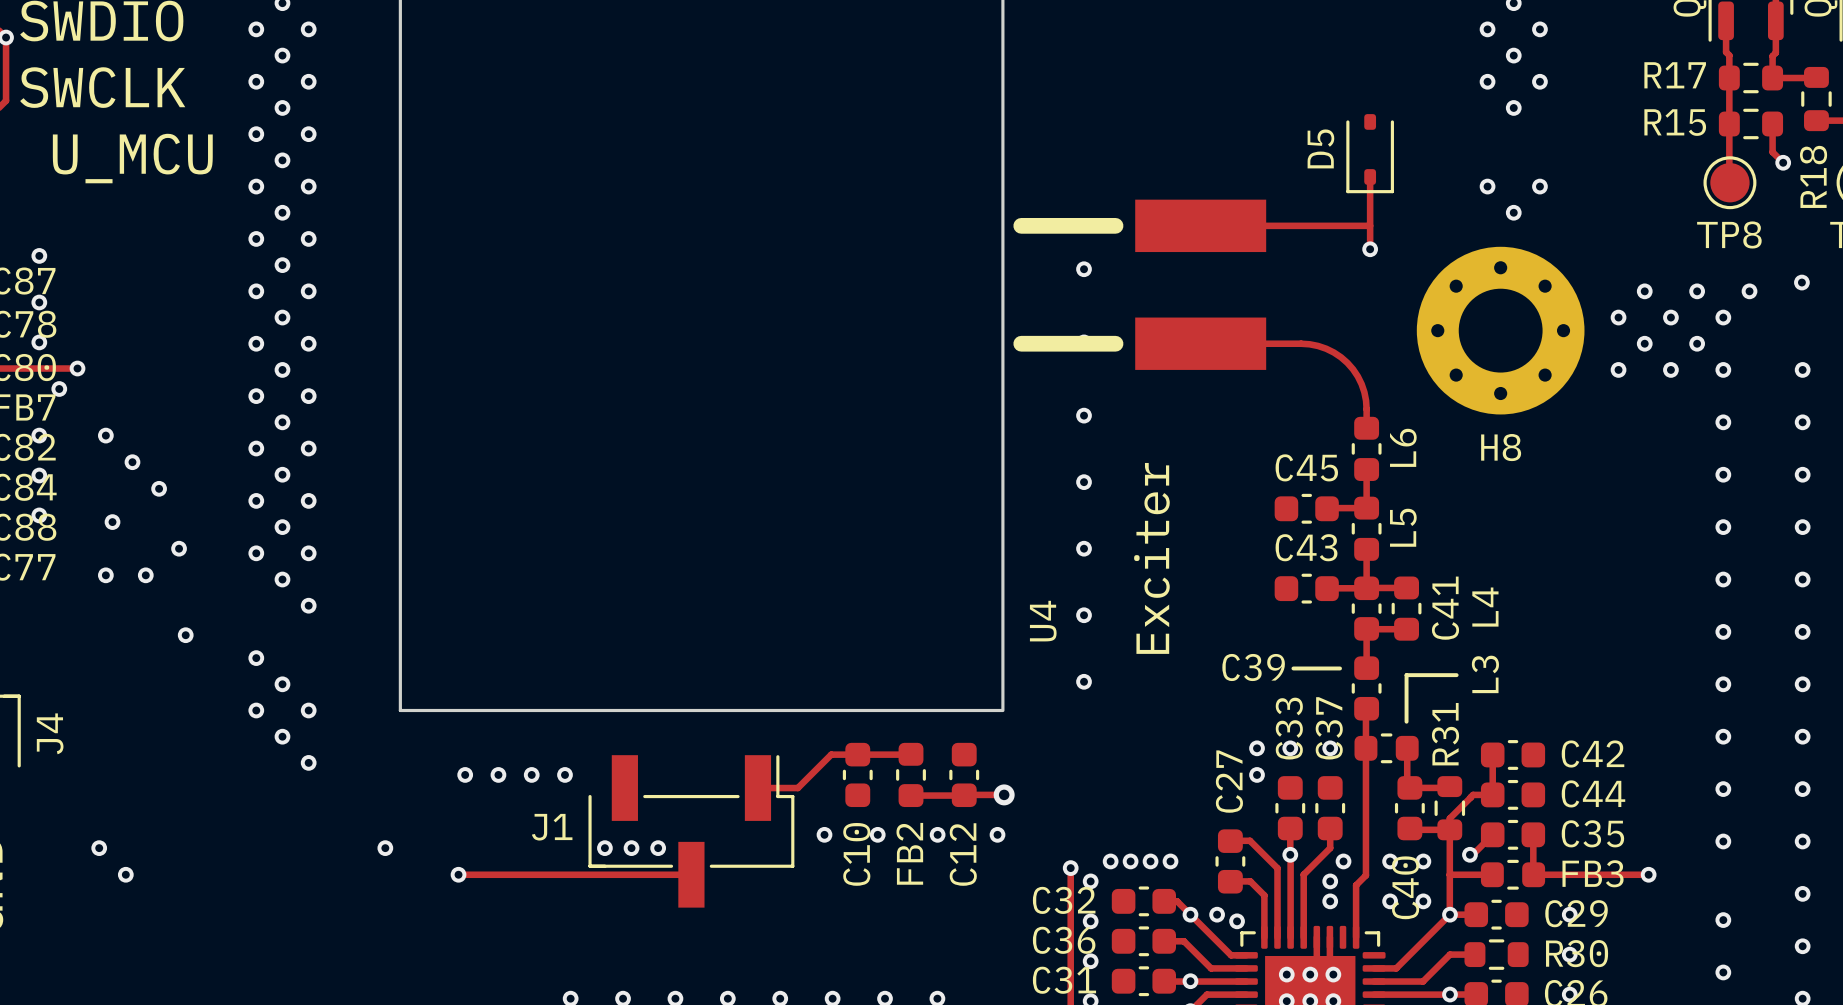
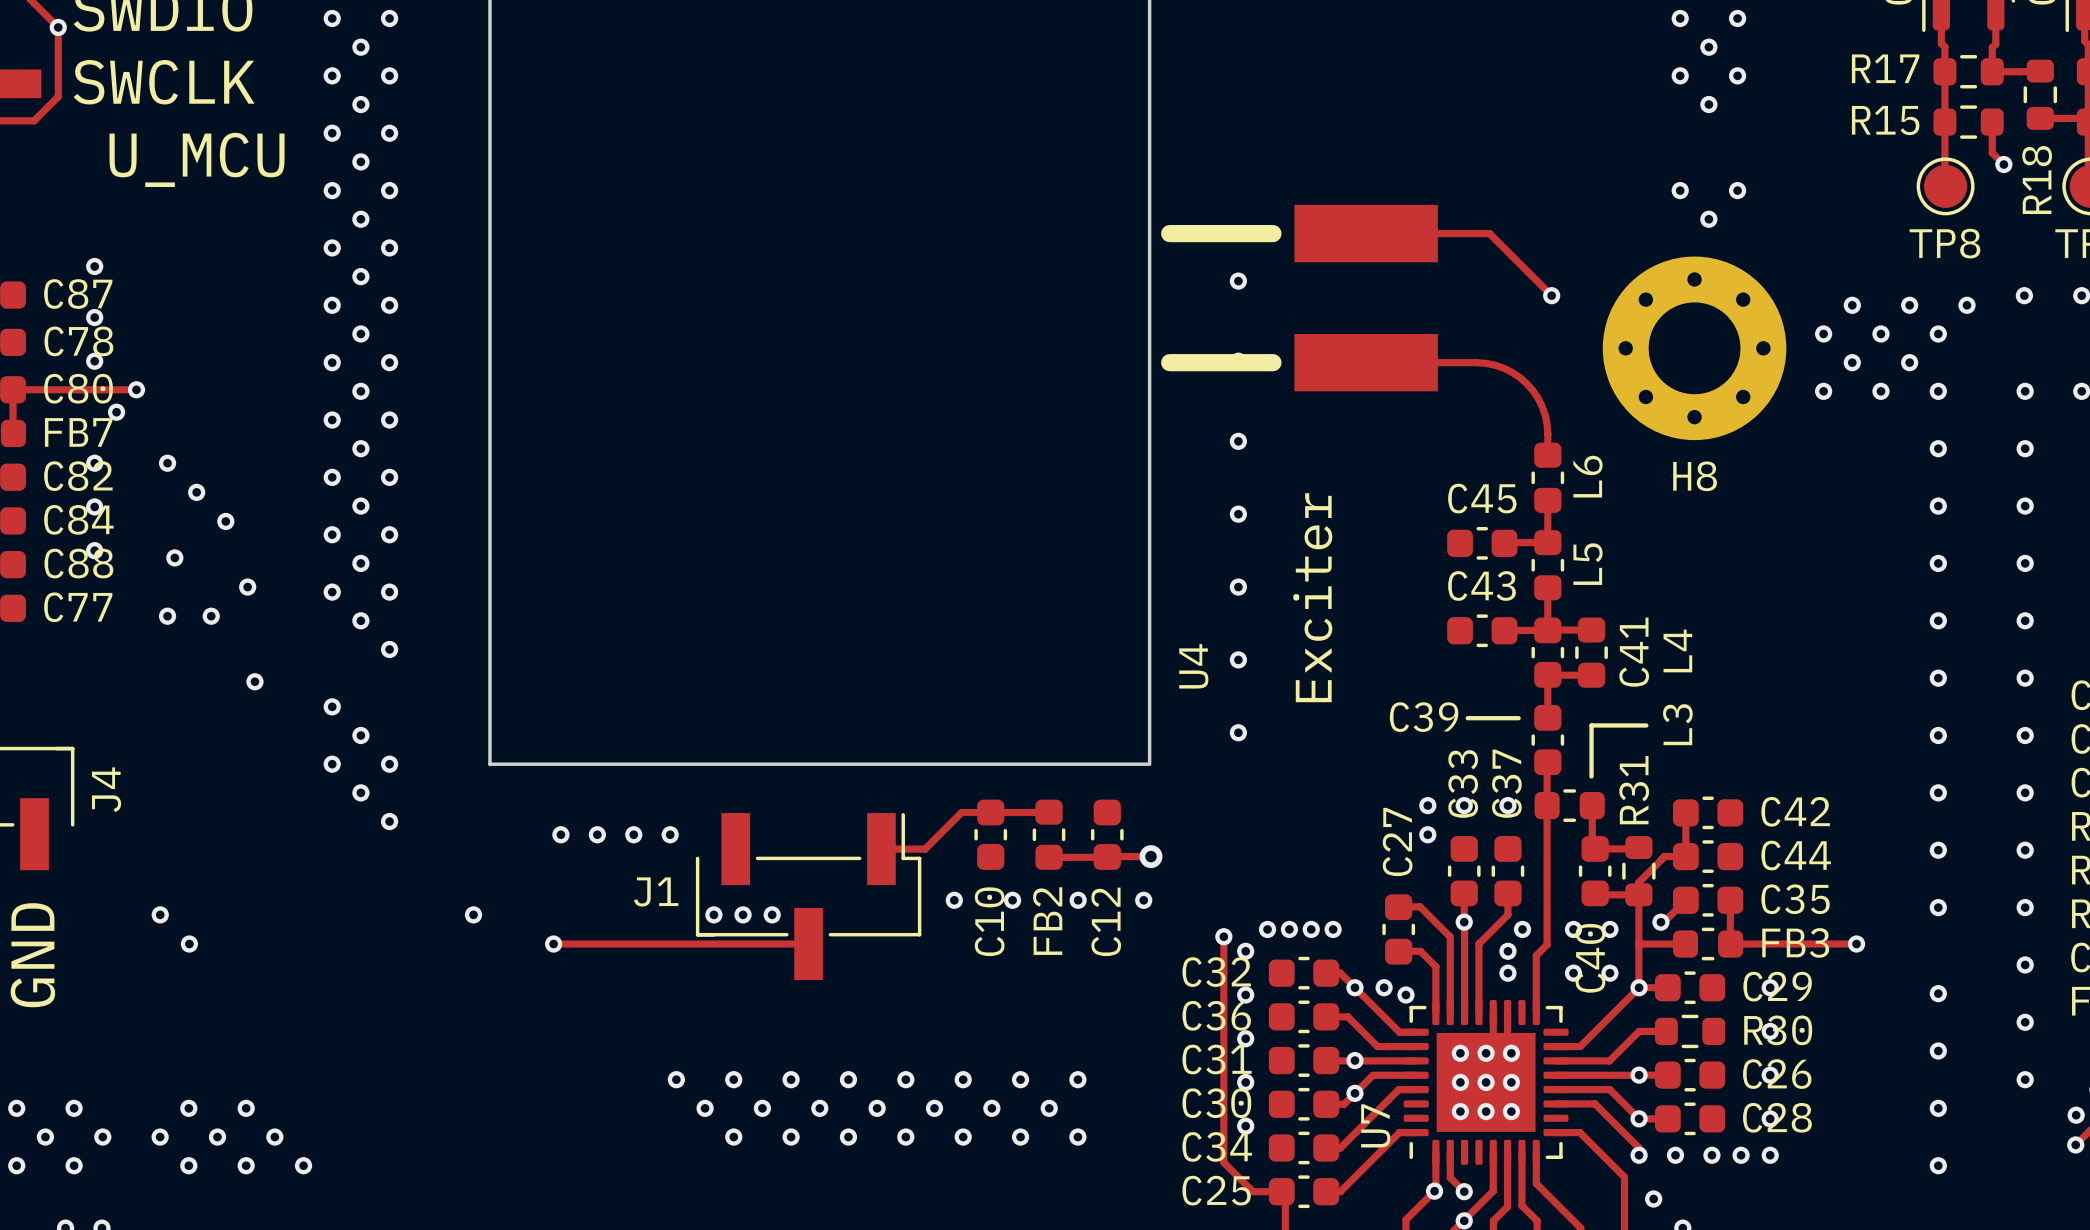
D5: (1370, 153) -> none
track: (1370, 176) (1370, 249) -> none
track: (1313, 225) (1370, 225) -> (1489, 233) (1551, 295)
via position: (1370, 249) -> (1551, 295)

